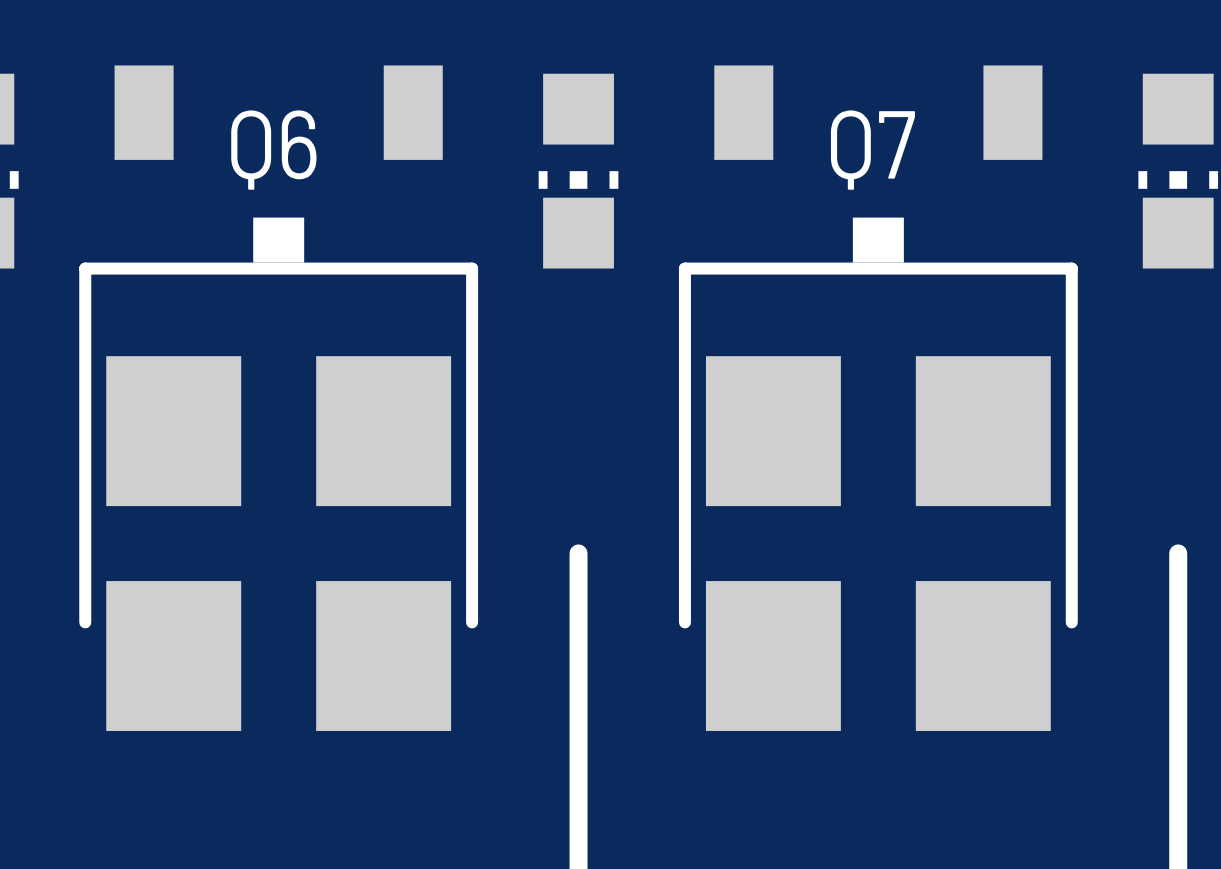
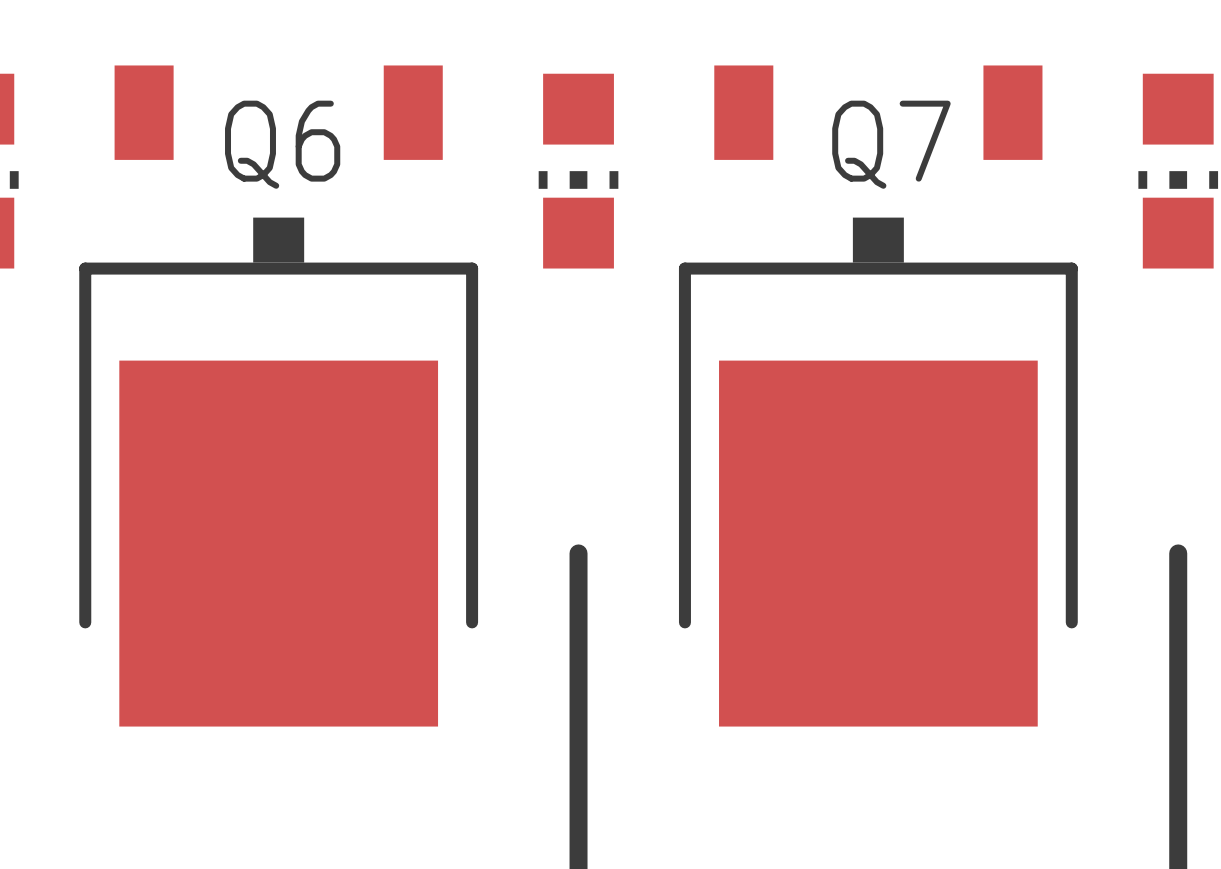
Q6 footprint: [79, 65, 479, 731] -> [79, 65, 479, 727]
Q7 footprint: [678, 65, 1078, 731] -> [678, 65, 1078, 727]

